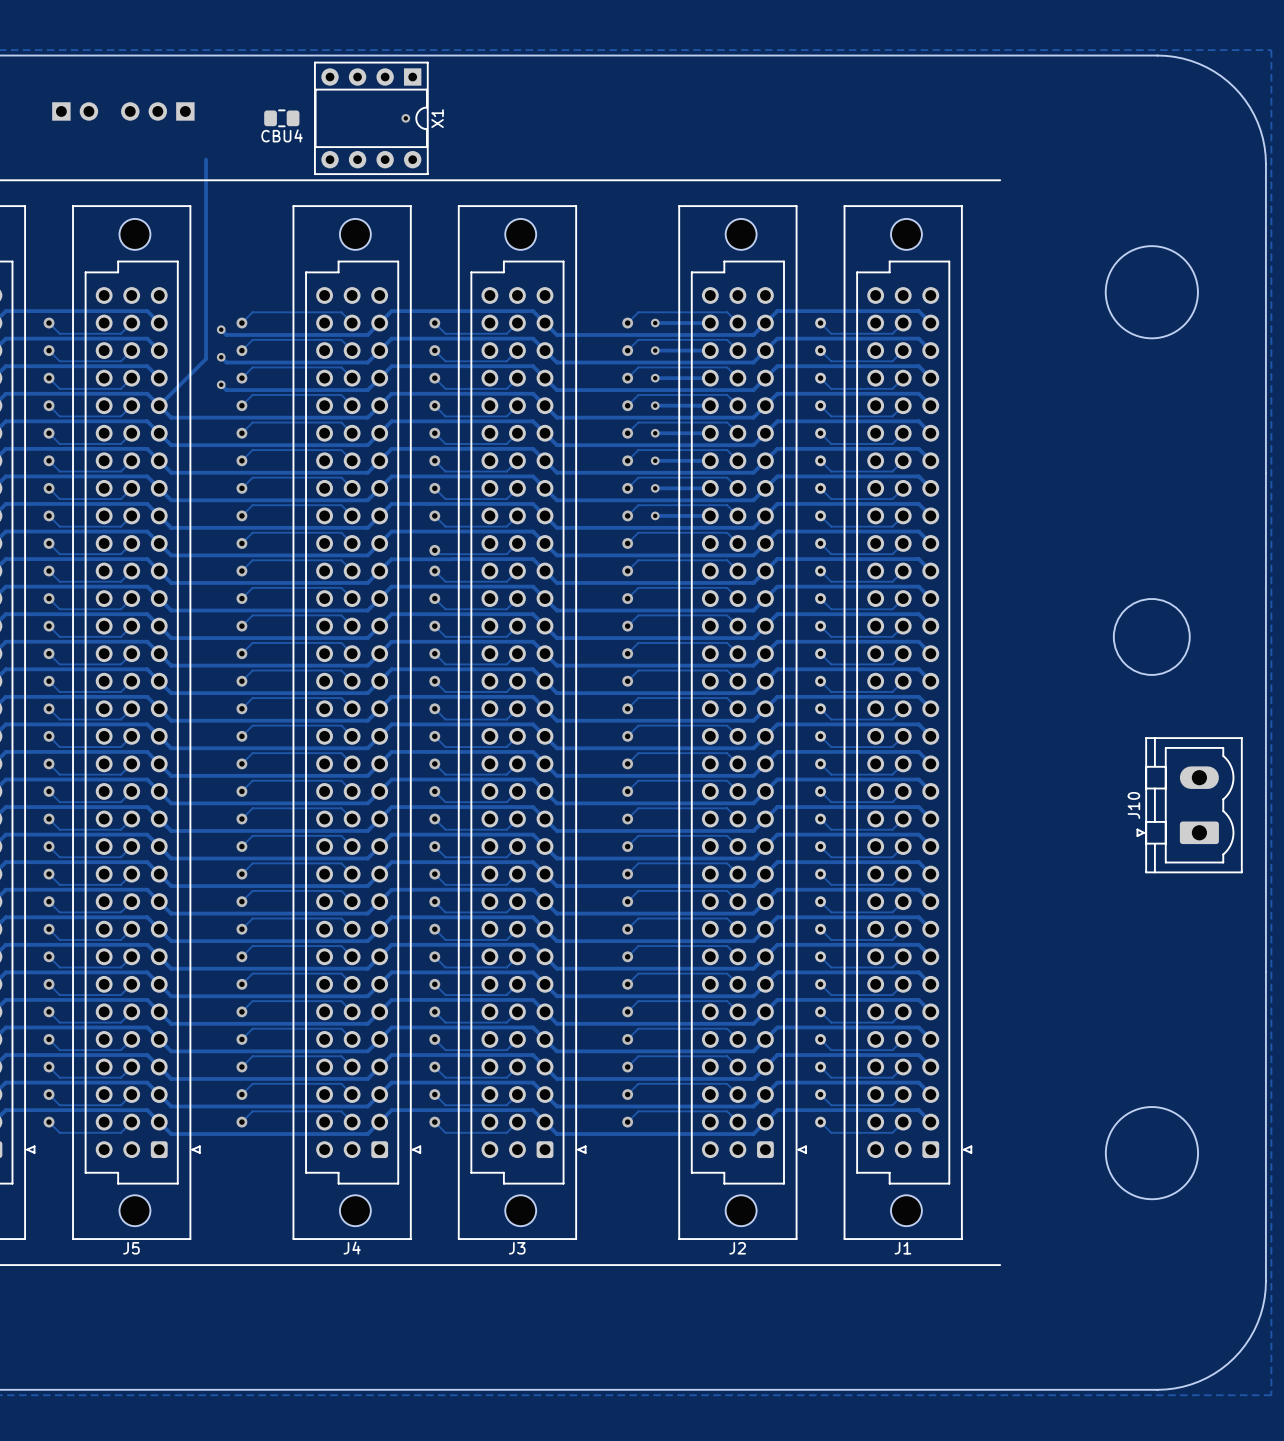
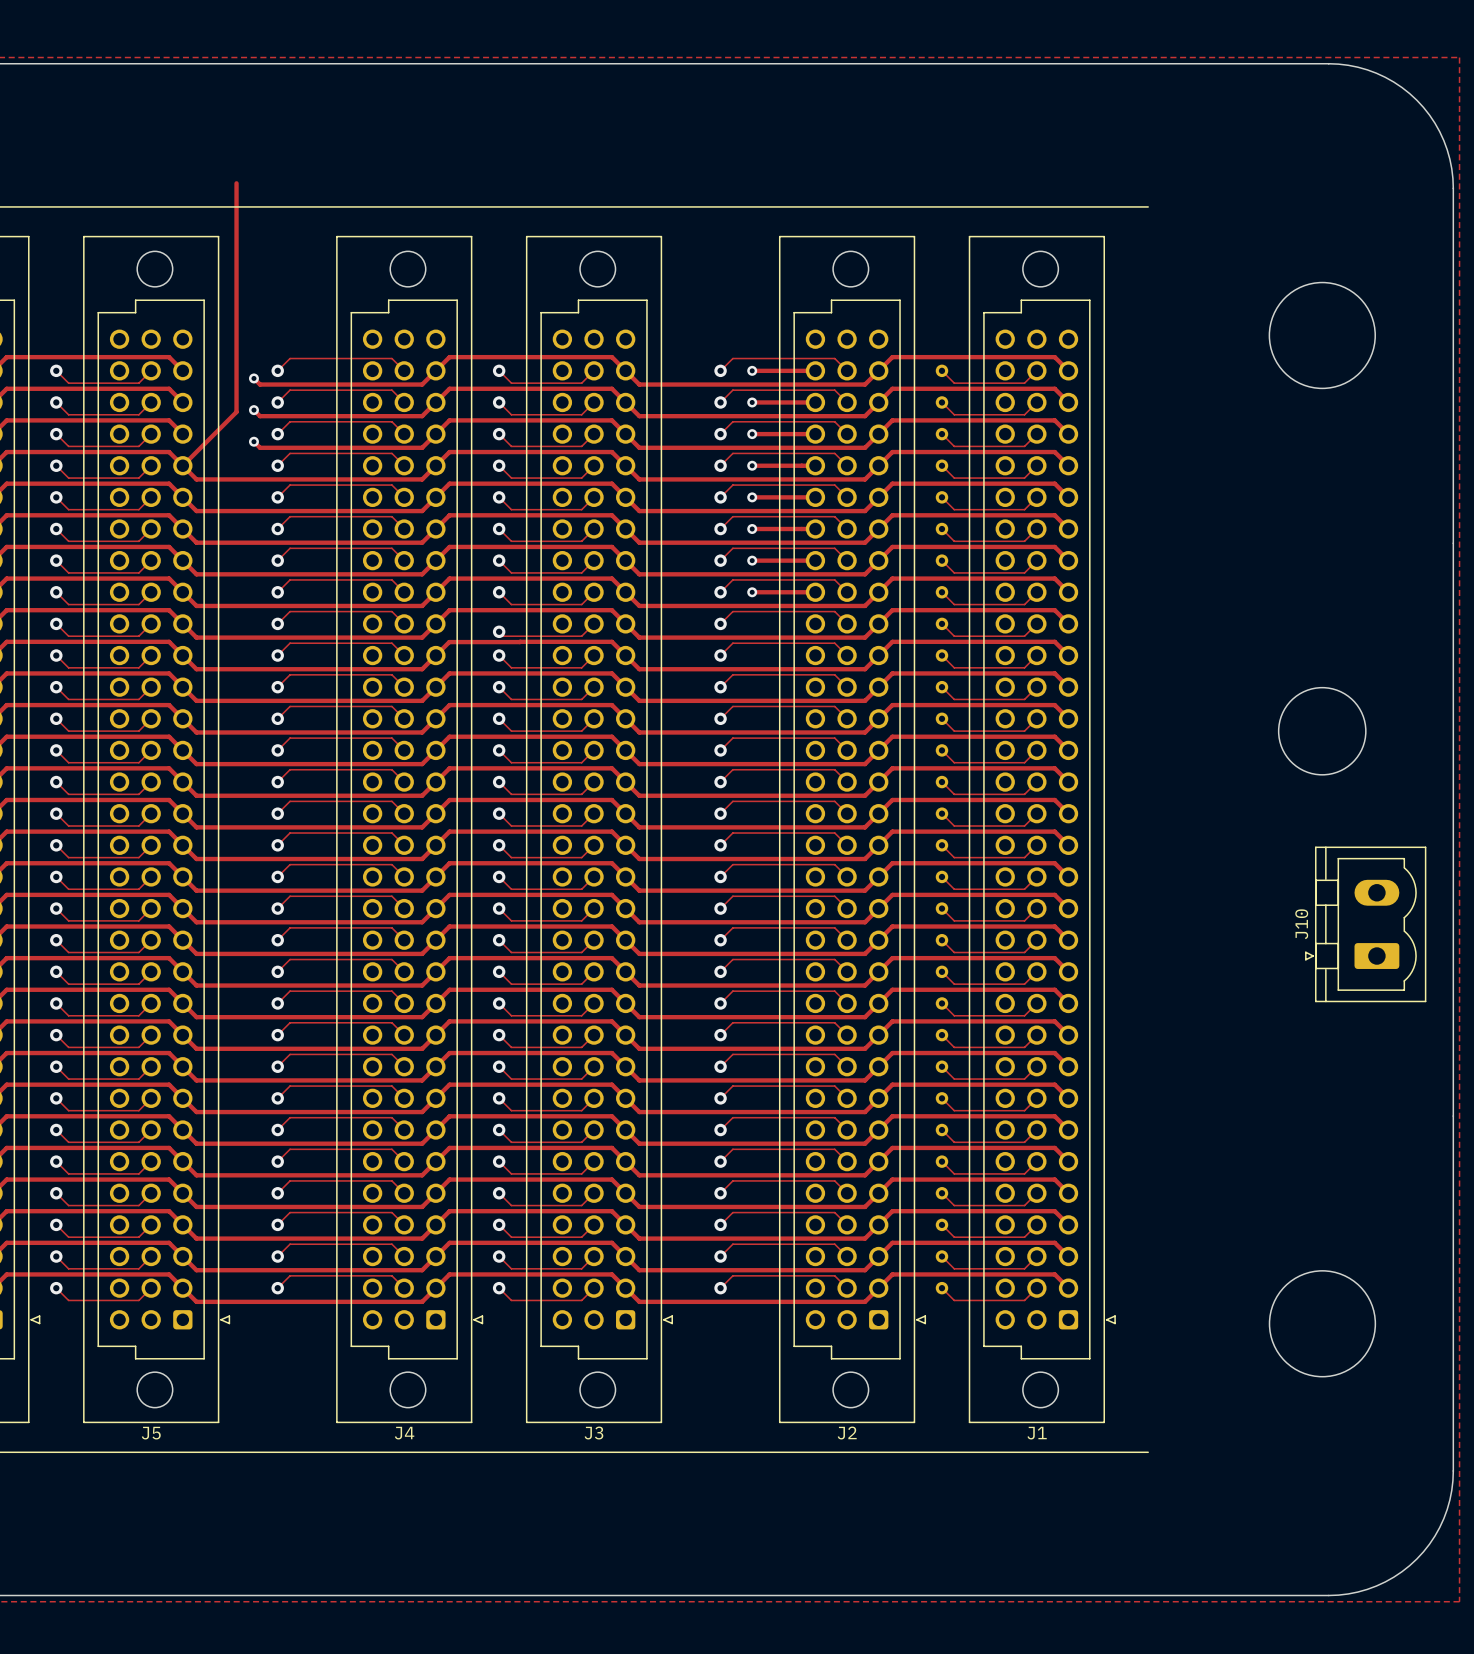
part: (75, 111) -> none
part: (157, 111) -> none
CBU4: (281, 118) -> none
X1: (371, 118) -> none
via: (405, 118) -> none

